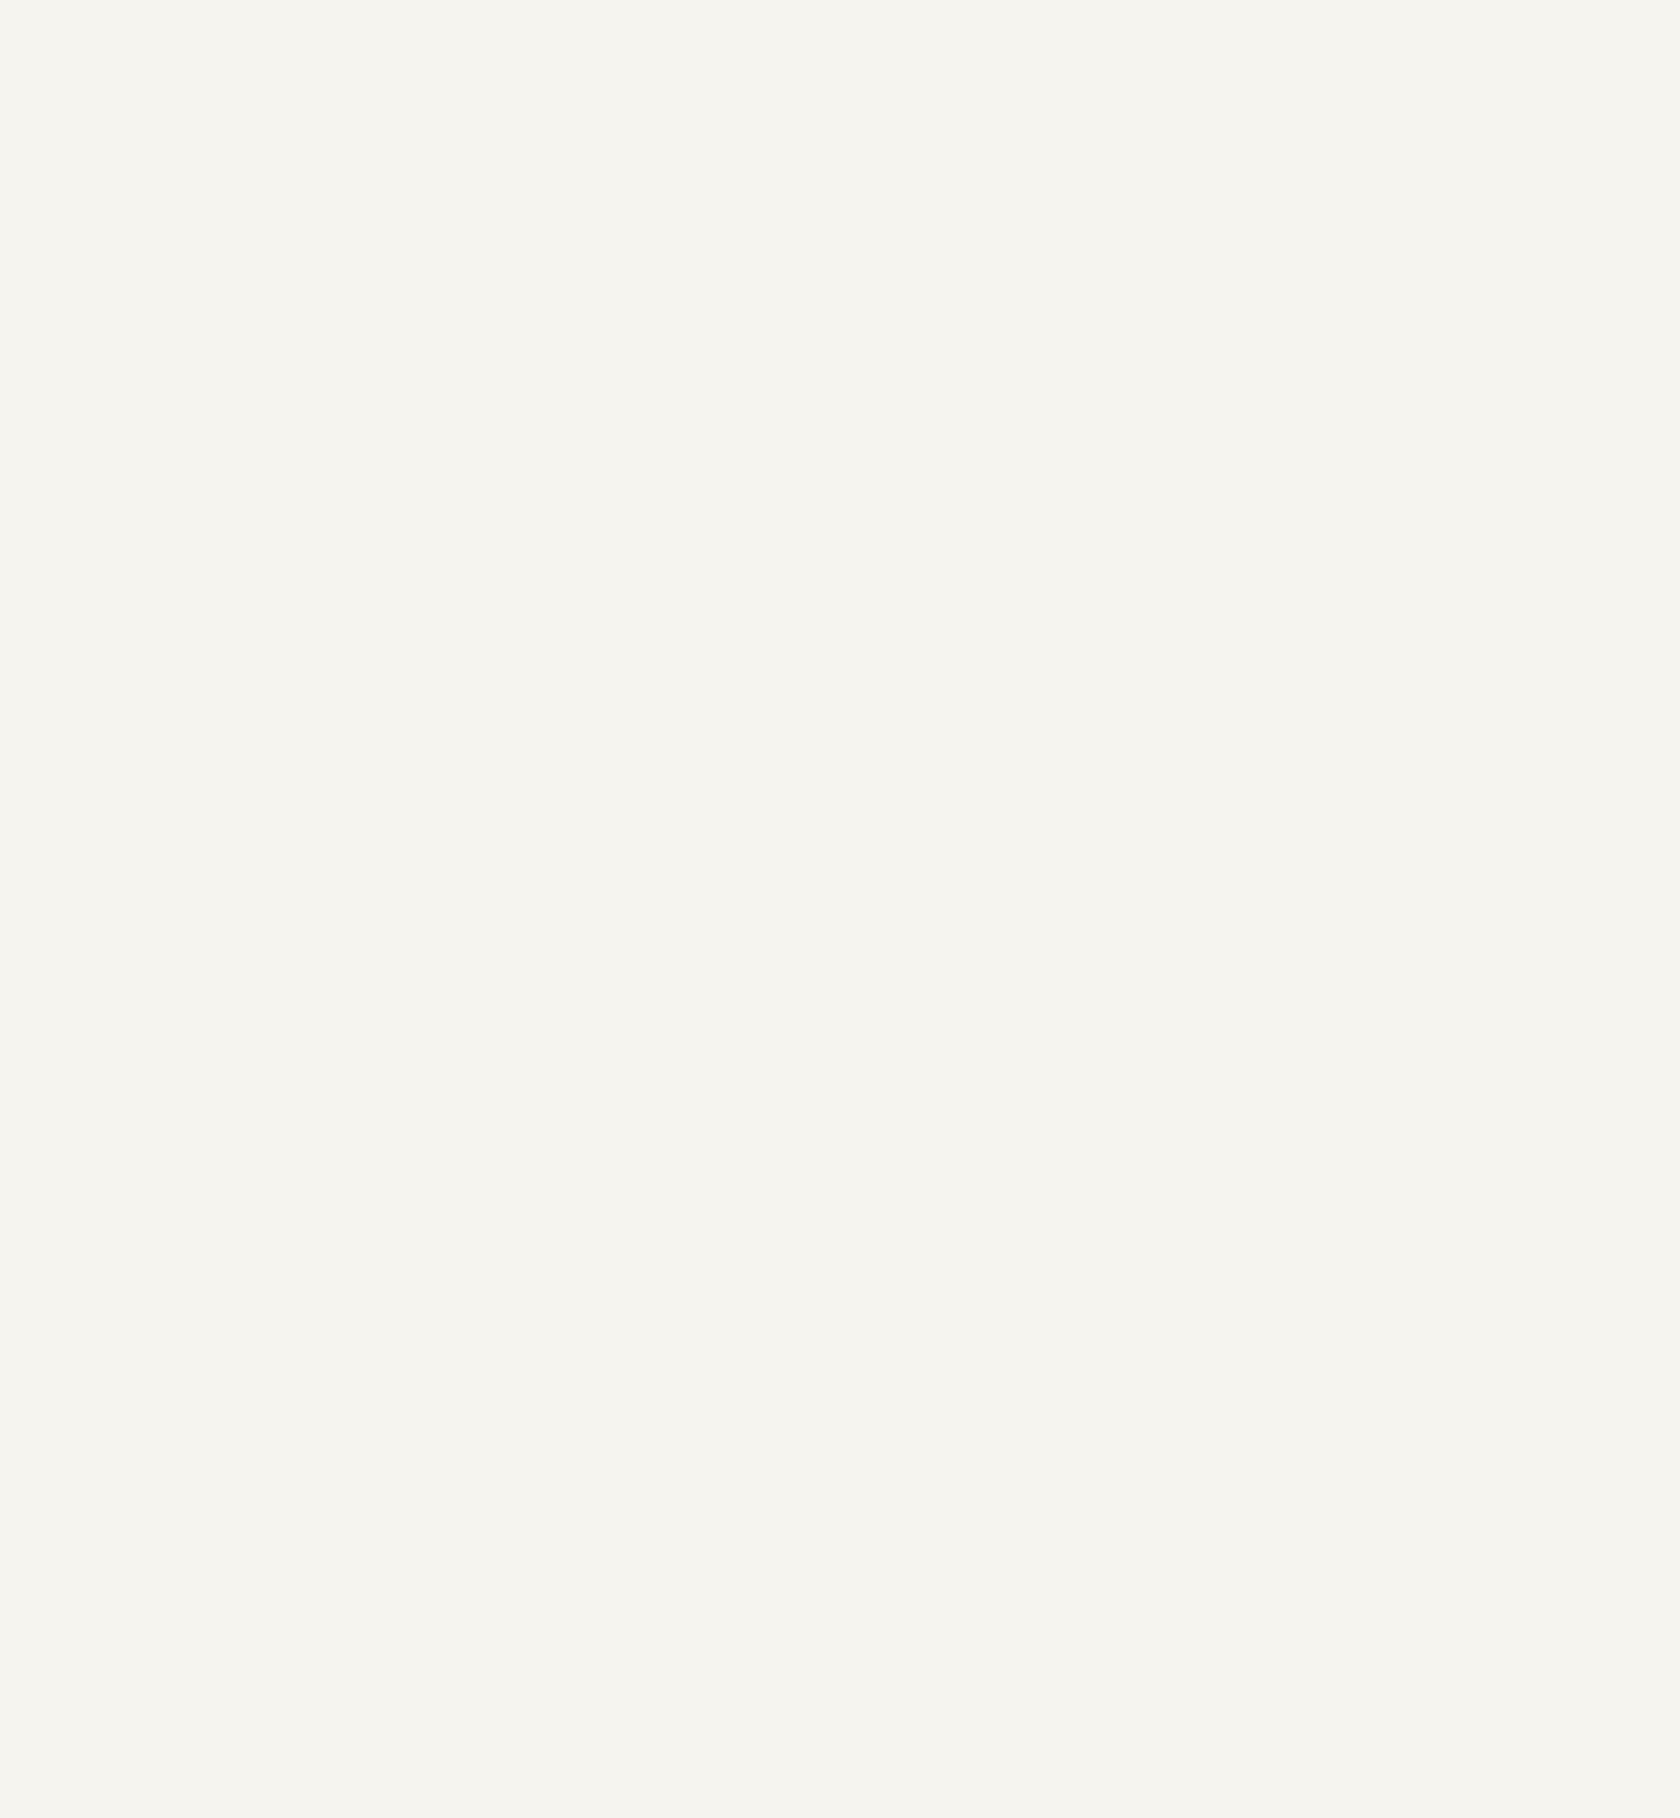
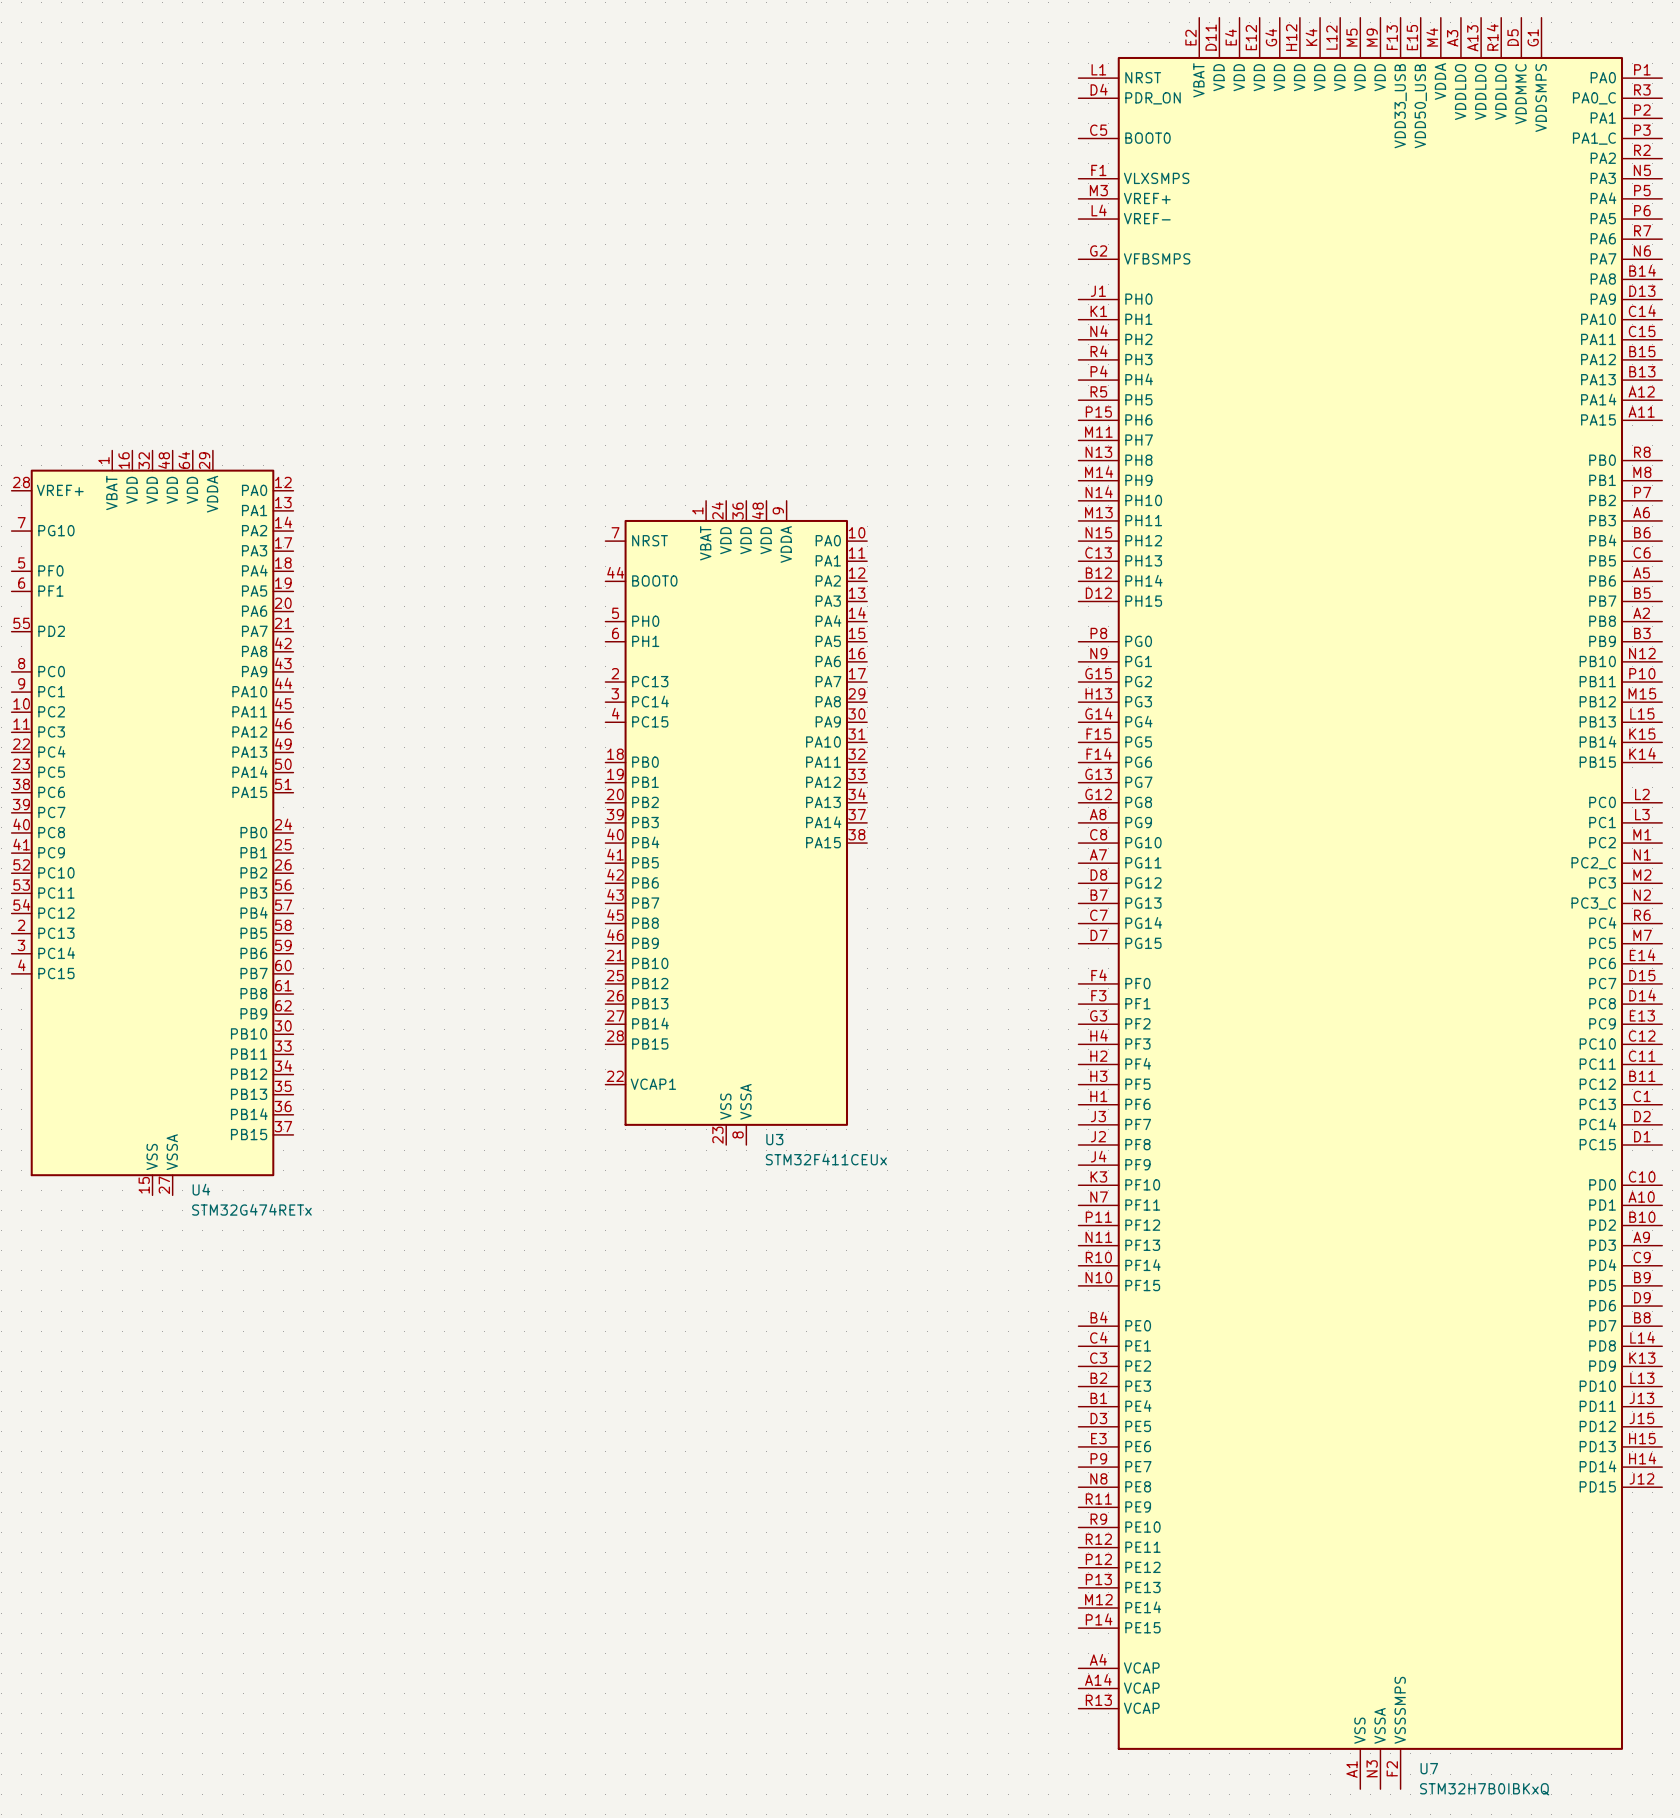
U4: none -> STM32G474RETx (152, 822)
U3: none -> STM32F411CEUx (736, 822)
U7: none -> STM32H7B0IBKxQ (1370, 903)

